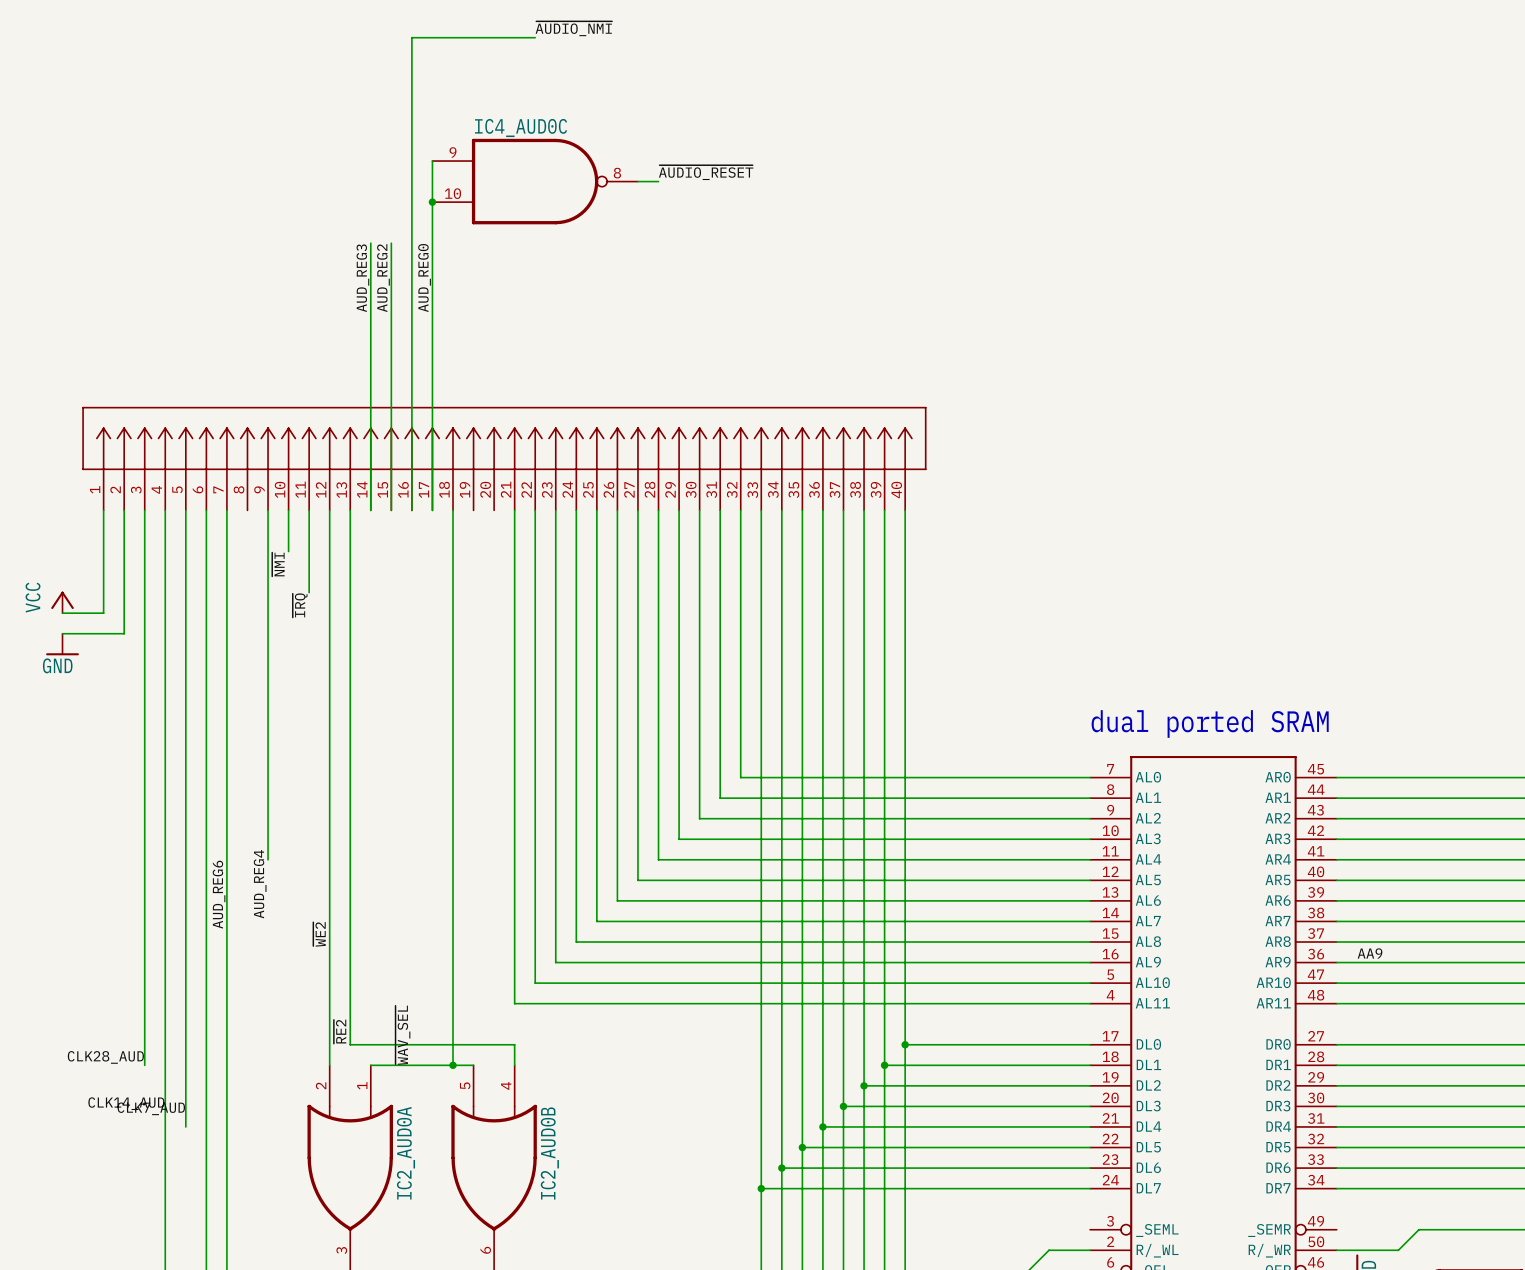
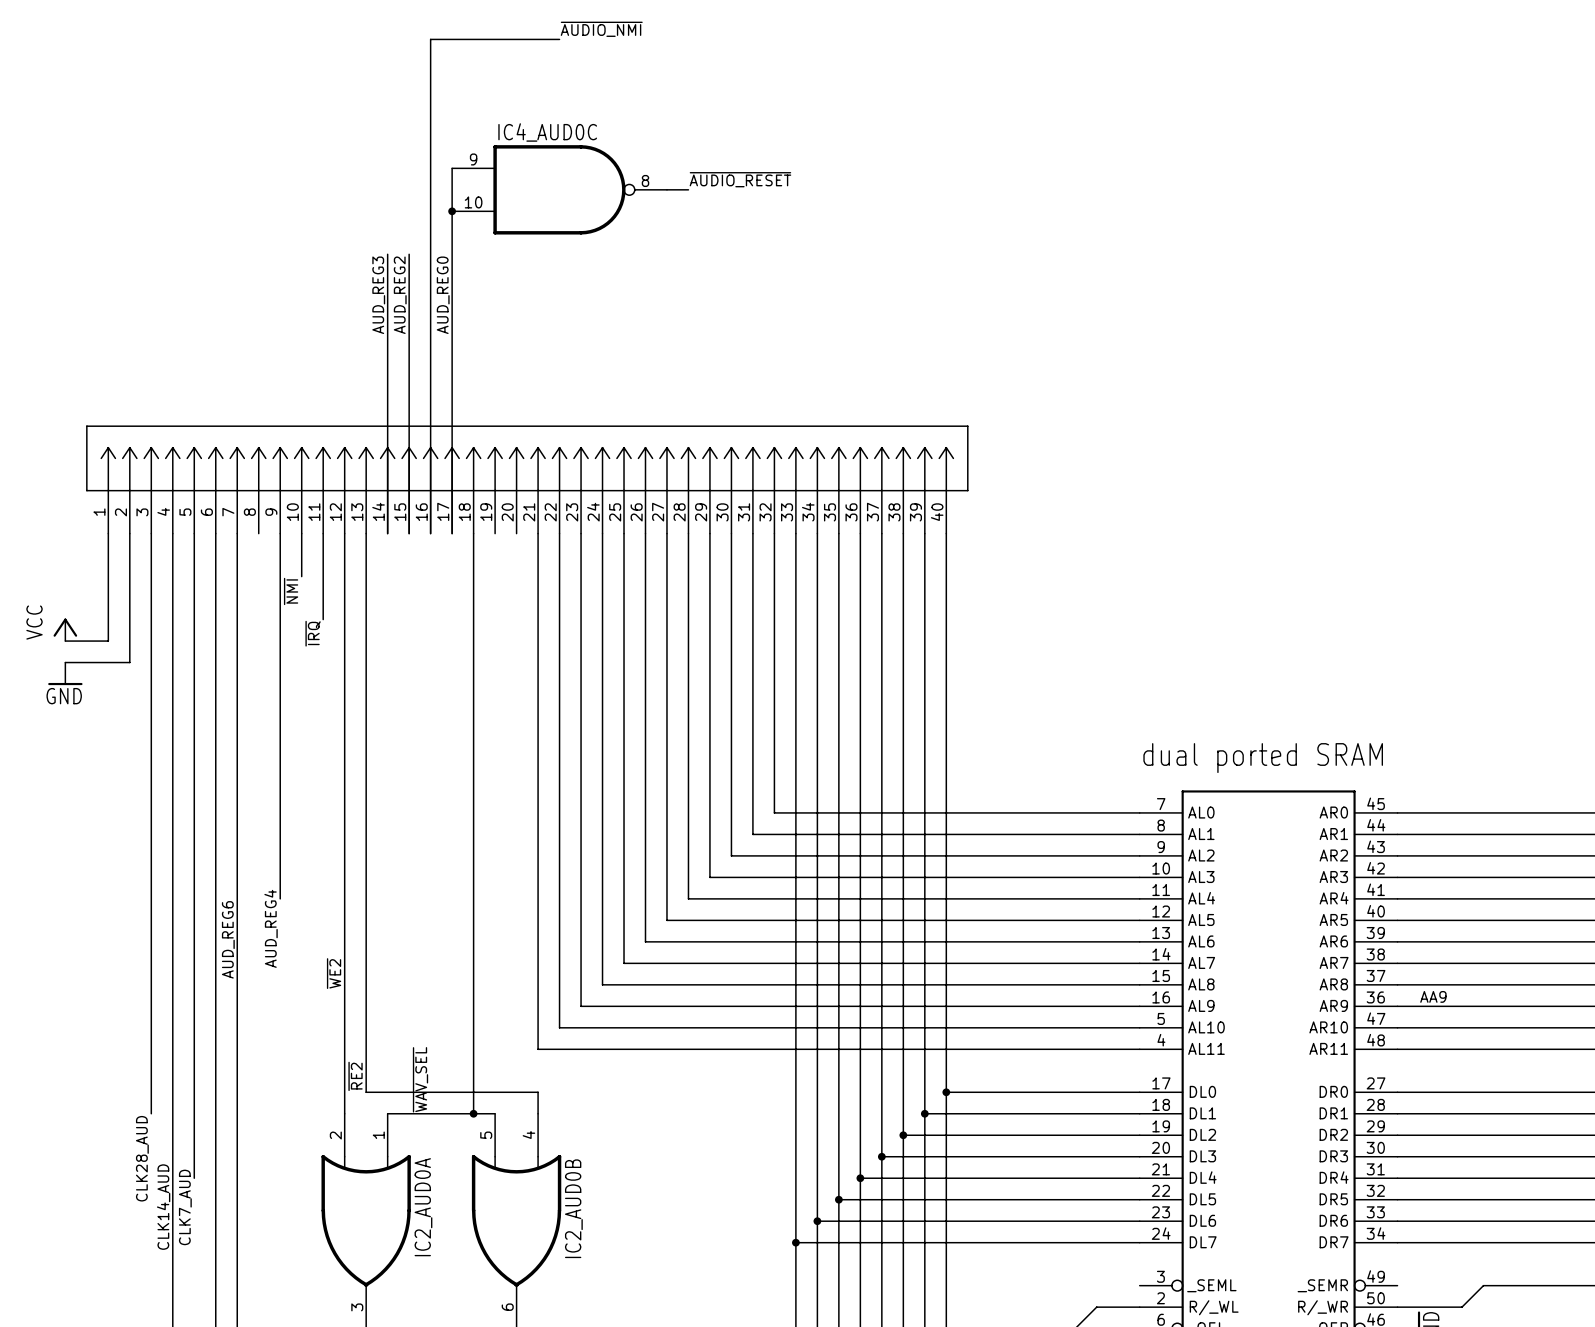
label rotation: 0° (105, 1057) -> 90° counterclockwise (142, 1158)
label rotation: 0° (126, 1103) -> 90° counterclockwise (163, 1207)
label rotation: 0° (151, 1108) -> 90° counterclockwise (185, 1207)

